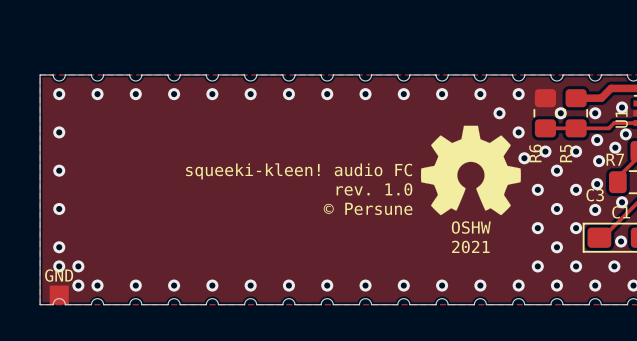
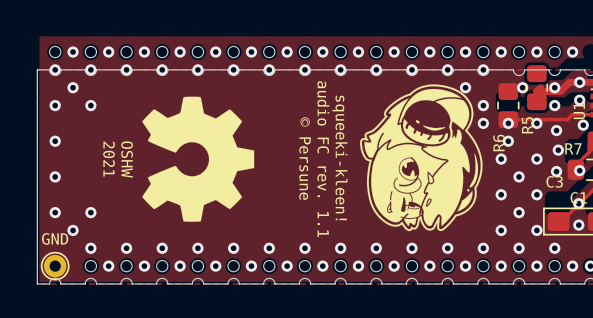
round board edge: none -> [49, 46, 62, 59]
round board edge: none -> [84, 46, 97, 59]
round board edge: none -> [120, 46, 133, 59]
round board edge: none -> [156, 46, 169, 59]
round board edge: none -> [191, 46, 204, 59]
round board edge: none -> [227, 46, 240, 59]
round board edge: none -> [263, 46, 276, 59]
round board edge: none -> [299, 46, 311, 59]
round board edge: none -> [334, 46, 347, 59]
round board edge: none -> [370, 46, 383, 59]
round board edge: none -> [406, 46, 418, 59]
round board edge: none -> [441, 46, 454, 59]
round board edge: none -> [477, 46, 490, 59]
round board edge: none -> [513, 46, 526, 59]
round board edge: none -> [548, 46, 561, 59]
via: none -> (73, 52)
via: none -> (108, 52)
via: none -> (144, 52)
via: none -> (180, 52)
via: none -> (215, 52)
via: none -> (251, 52)
via: none -> (287, 52)
via: none -> (322, 52)
via: none -> (358, 52)
via: none -> (394, 52)
via: none -> (429, 52)
via: none -> (465, 52)
via: none -> (501, 52)
via: none -> (536, 52)
via: none -> (572, 52)
via: none -> (55, 69)
via: none -> (90, 69)
via: none -> (447, 69)
via: none -> (483, 69)
via: none -> (579, 82)
drawing: none -> [360, 84, 483, 232]
via: (59, 94) -> none
via: none -> (73, 87)
via: (97, 94) -> none
via position: (135, 94) -> (126, 69)
via position: (174, 94) -> (162, 69)
via position: (212, 94) -> (197, 69)
via position: (250, 94) -> (233, 69)
via position: (288, 94) -> (269, 69)
via position: (327, 94) -> (304, 69)
via position: (365, 94) -> (340, 69)
via position: (403, 94) -> (376, 69)
via position: (442, 94) -> (412, 69)
via: (480, 94) -> none
via: none -> (465, 87)
via: (518, 94) -> none
via: none -> (522, 87)
via: none -> (554, 87)
drawing: none -> [142, 96, 255, 222]
via: none -> (55, 105)
via: none -> (90, 105)
via: (499, 113) -> none
via: none -> (483, 105)
via: (560, 113) -> none
R5 position: (576, 113) -> (536, 87)
drawing: [420, 125, 521, 216] -> none
via: (59, 132) -> none
via: none -> (508, 123)
via: none -> (536, 123)
via: (615, 147) -> none
via: none -> (55, 141)
via: (576, 151) -> none
via: (524, 158) -> none
via: (59, 170) -> none
text: none -> audio FC rev. 1.1 (323, 159)
via: none -> (501, 159)
via: (556, 170) -> none
via: none -> (536, 159)
text: squeeki-kleen! audio FC (299, 171) -> squeeki-kleen! (339, 157)
via: none -> (579, 170)
via: none -> (55, 176)
text: rev. 1.0 (374, 189) -> none
via: (537, 189) -> none
via: none -> (519, 176)
via: (576, 189) -> none
via: (622, 202) -> none
via: (59, 208) -> none
text rotation: 0° (368, 208) -> 90° clockwise (305, 158)
via: none -> (501, 194)
via: (556, 208) -> none
via: none -> (536, 194)
via: (595, 209) -> none
via: none -> (578, 203)
text rotation: 0° (471, 227) -> 90° clockwise (127, 159)
text position: OSHW (471, 227) -> OSHW (127, 159)
via: none -> (55, 212)
via: none -> (90, 212)
via: (537, 228) -> none
via: none -> (519, 212)
via: (576, 228) -> none
text rotation: 0° (470, 246) -> 90° clockwise (109, 159)
text position: 2021 (470, 246) -> 2021 (109, 159)
via: (59, 247) -> none
via: none -> (73, 230)
via: none -> (501, 230)
via: (556, 247) -> none
via: none -> (536, 230)
via: (59, 266) -> none
via: (78, 266) -> none
via: none -> (90, 248)
via: none -> (126, 248)
via: none -> (162, 248)
via: none -> (197, 248)
via: none -> (233, 248)
via: none -> (269, 248)
via: none -> (304, 248)
via: none -> (340, 248)
via: none -> (376, 248)
via: none -> (412, 248)
via: none -> (447, 248)
via: none -> (483, 248)
via: (537, 266) -> none
via: none -> (519, 248)
via: (576, 266) -> none
via: none -> (554, 248)
via: (614, 266) -> none
round board edge: none -> [84, 260, 97, 273]
round board edge: none -> [120, 260, 133, 273]
round board edge: none -> [156, 260, 169, 273]
round board edge: none -> [191, 260, 204, 273]
round board edge: none -> [227, 260, 240, 273]
round board edge: none -> [263, 260, 276, 273]
round board edge: none -> [299, 260, 311, 273]
round board edge: none -> [334, 260, 347, 273]
round board edge: none -> [370, 260, 383, 273]
round board edge: none -> [406, 260, 418, 273]
round board edge: none -> [441, 260, 454, 273]
round board edge: none -> [477, 260, 490, 273]
round board edge: none -> [513, 260, 526, 273]
round board edge: none -> [548, 260, 561, 273]
part footprint: [49, 285, 69, 305] -> [40, 251, 70, 281]
via: (78, 285) -> none
via: (97, 285) -> none
via: none -> (108, 266)
via: (135, 285) -> none
via: none -> (144, 266)
via: (174, 285) -> none
via: none -> (180, 266)
via: (212, 285) -> none
via: none -> (215, 266)
via: (250, 285) -> none
via: none -> (251, 266)
via: (288, 285) -> none
via: none -> (287, 266)
via: (327, 285) -> none
via: none -> (322, 266)
via: (365, 285) -> none
via: none -> (358, 266)
via: (403, 285) -> none
via: none -> (394, 266)
via: (442, 285) -> none
via: none -> (429, 266)
via: (480, 285) -> none
via: none -> (465, 266)
via: (518, 285) -> none
via: none -> (501, 266)
via: (556, 285) -> none
via: none -> (536, 266)
via: (595, 285) -> none
via: none -> (572, 266)

